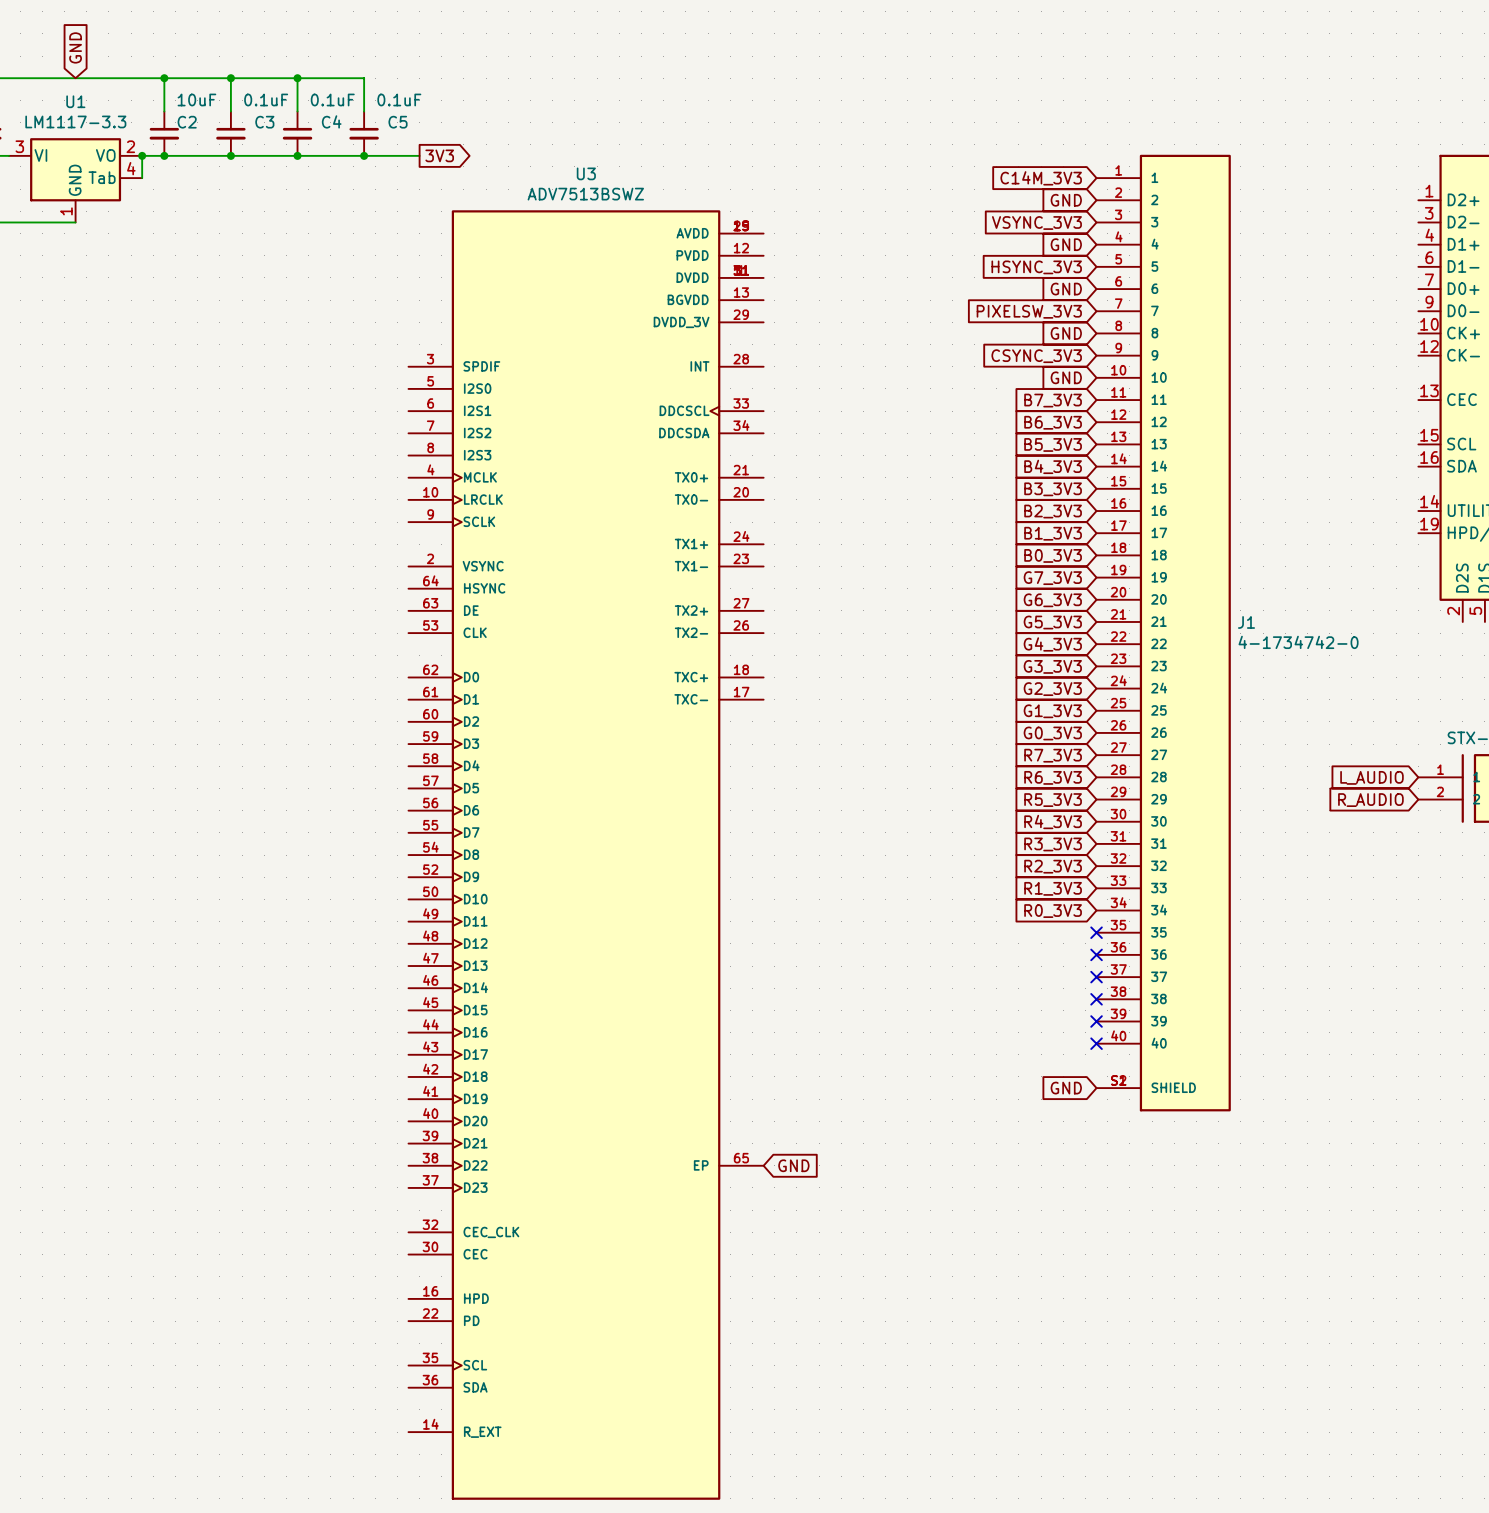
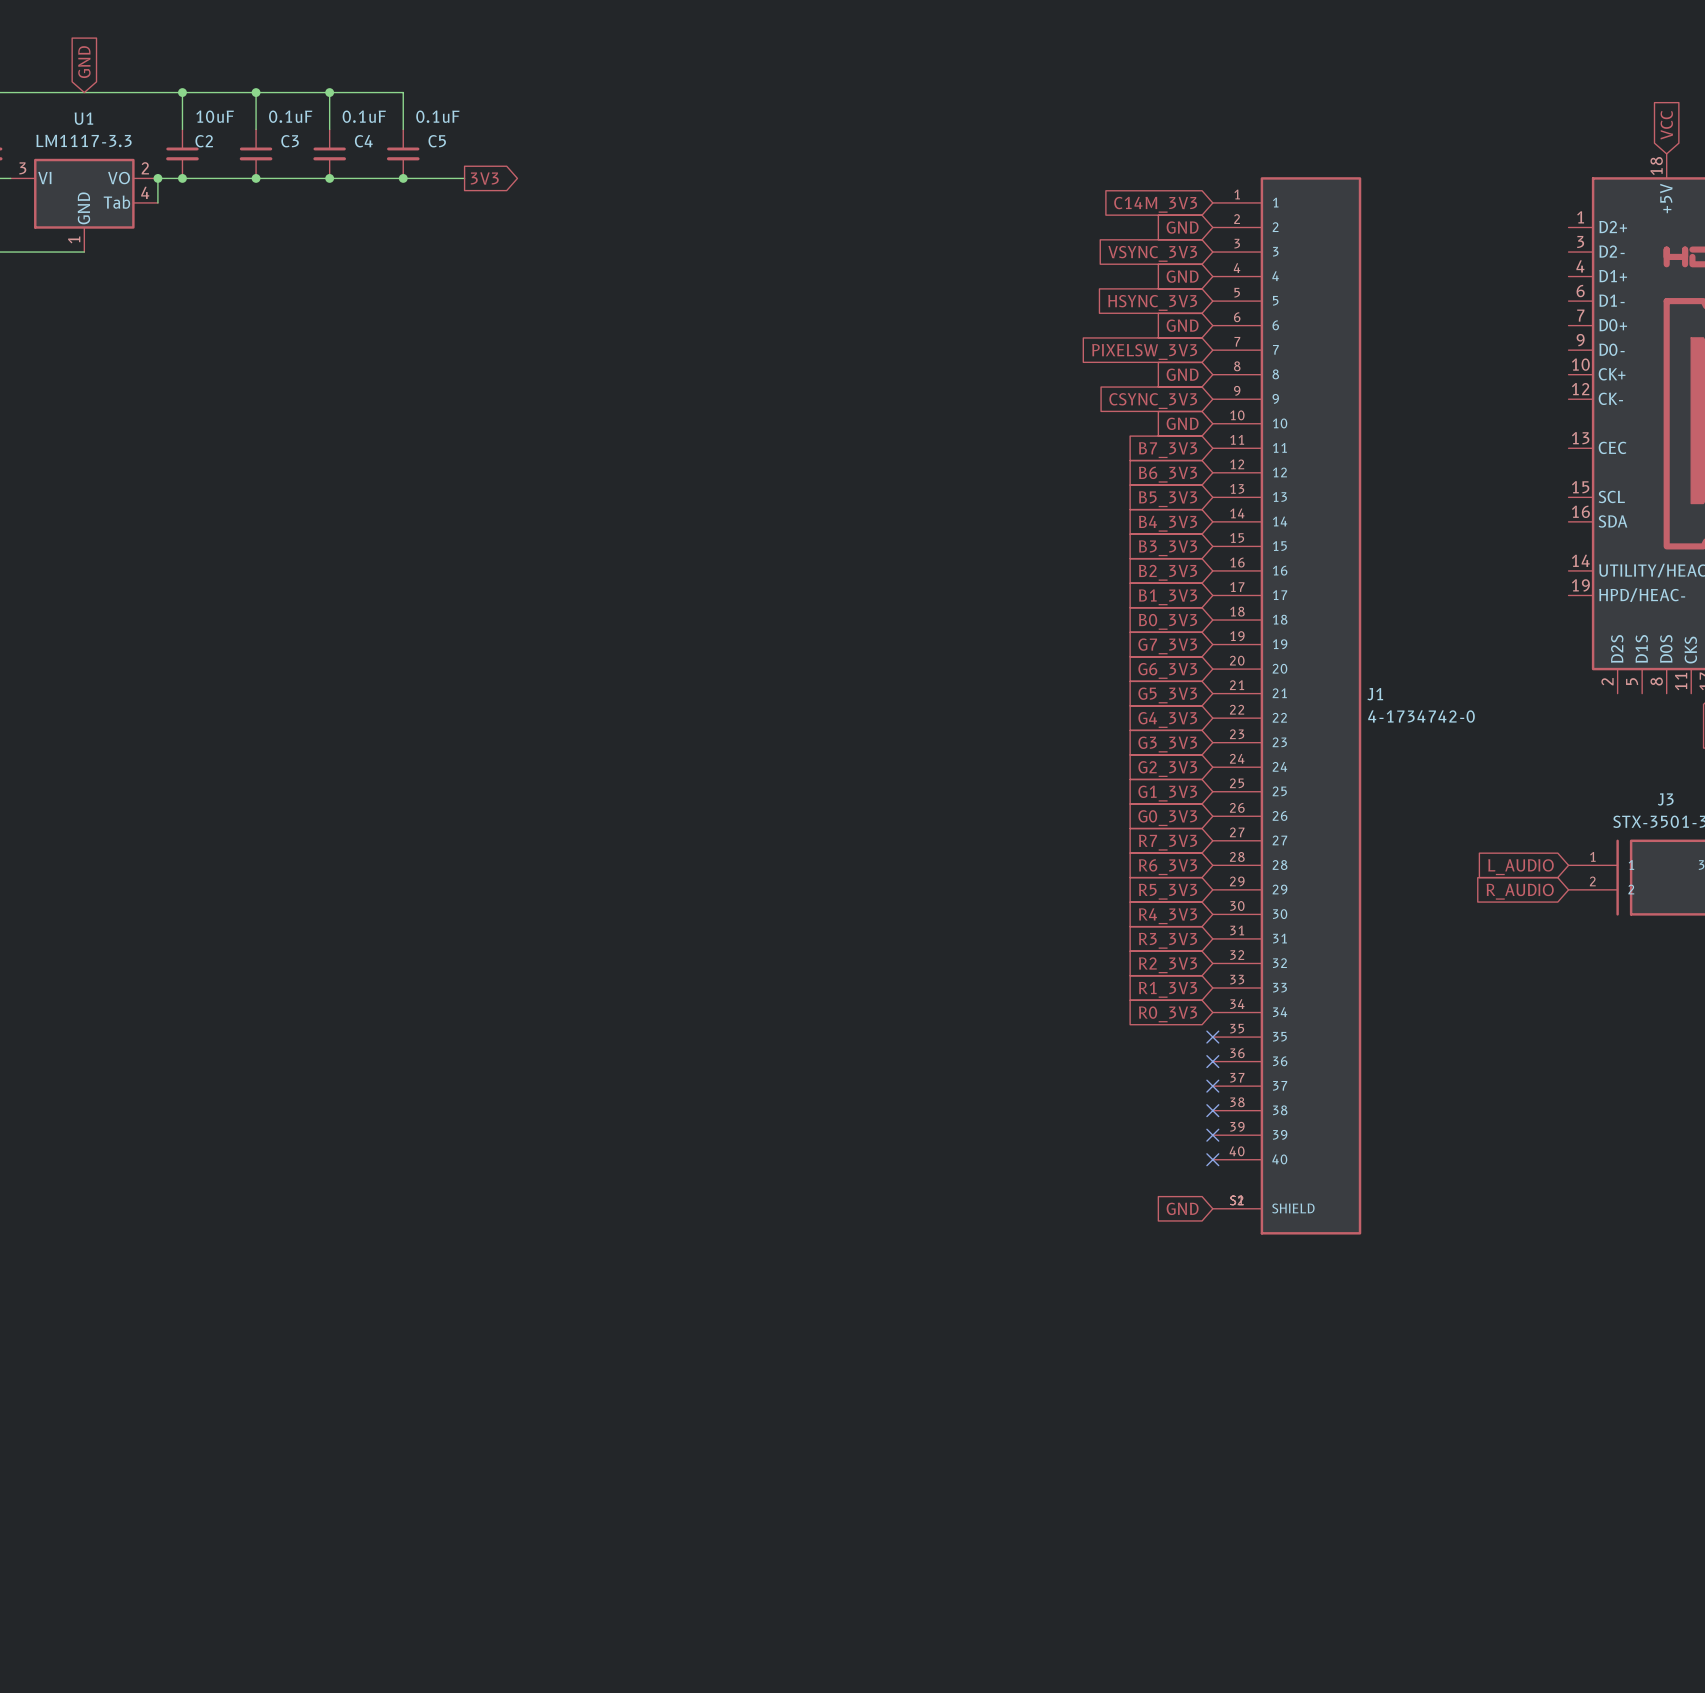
U3: ADV7513BSWZ (586, 855) -> none
global label: GND (793, 1165) -> none

